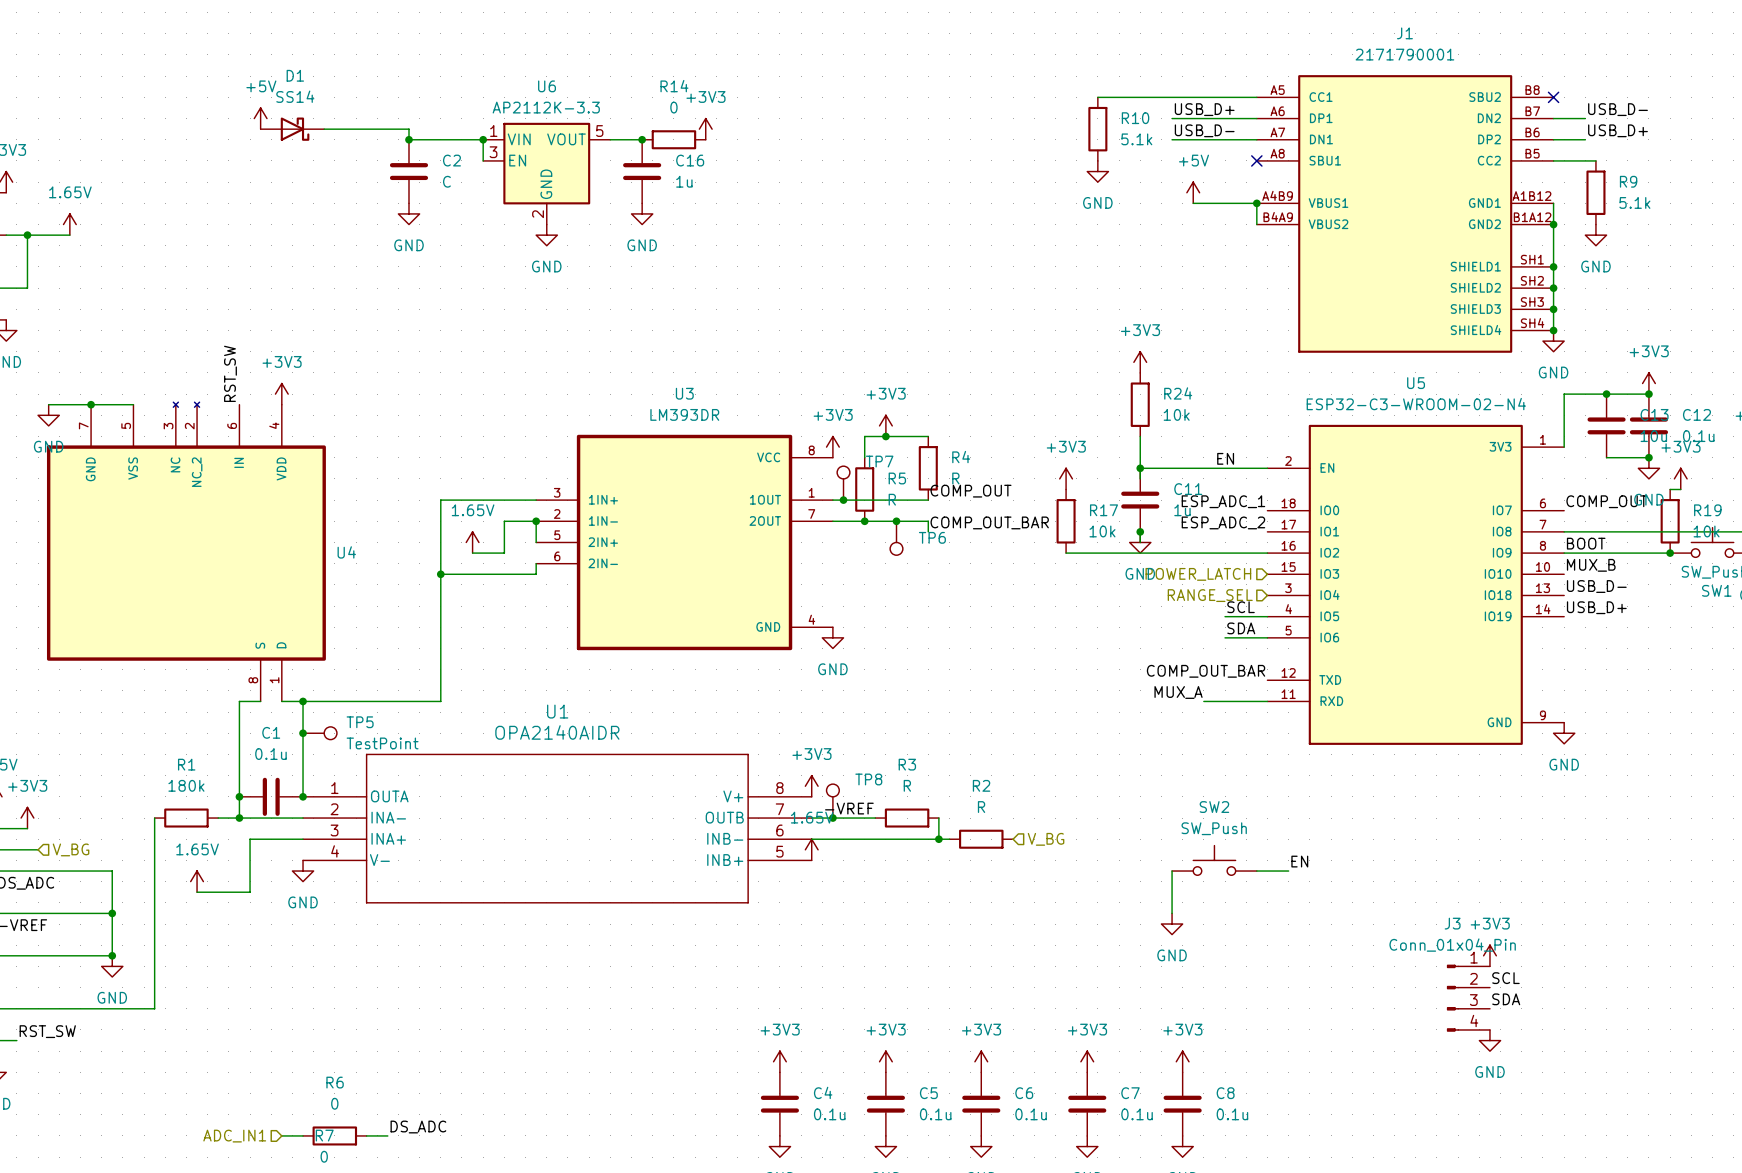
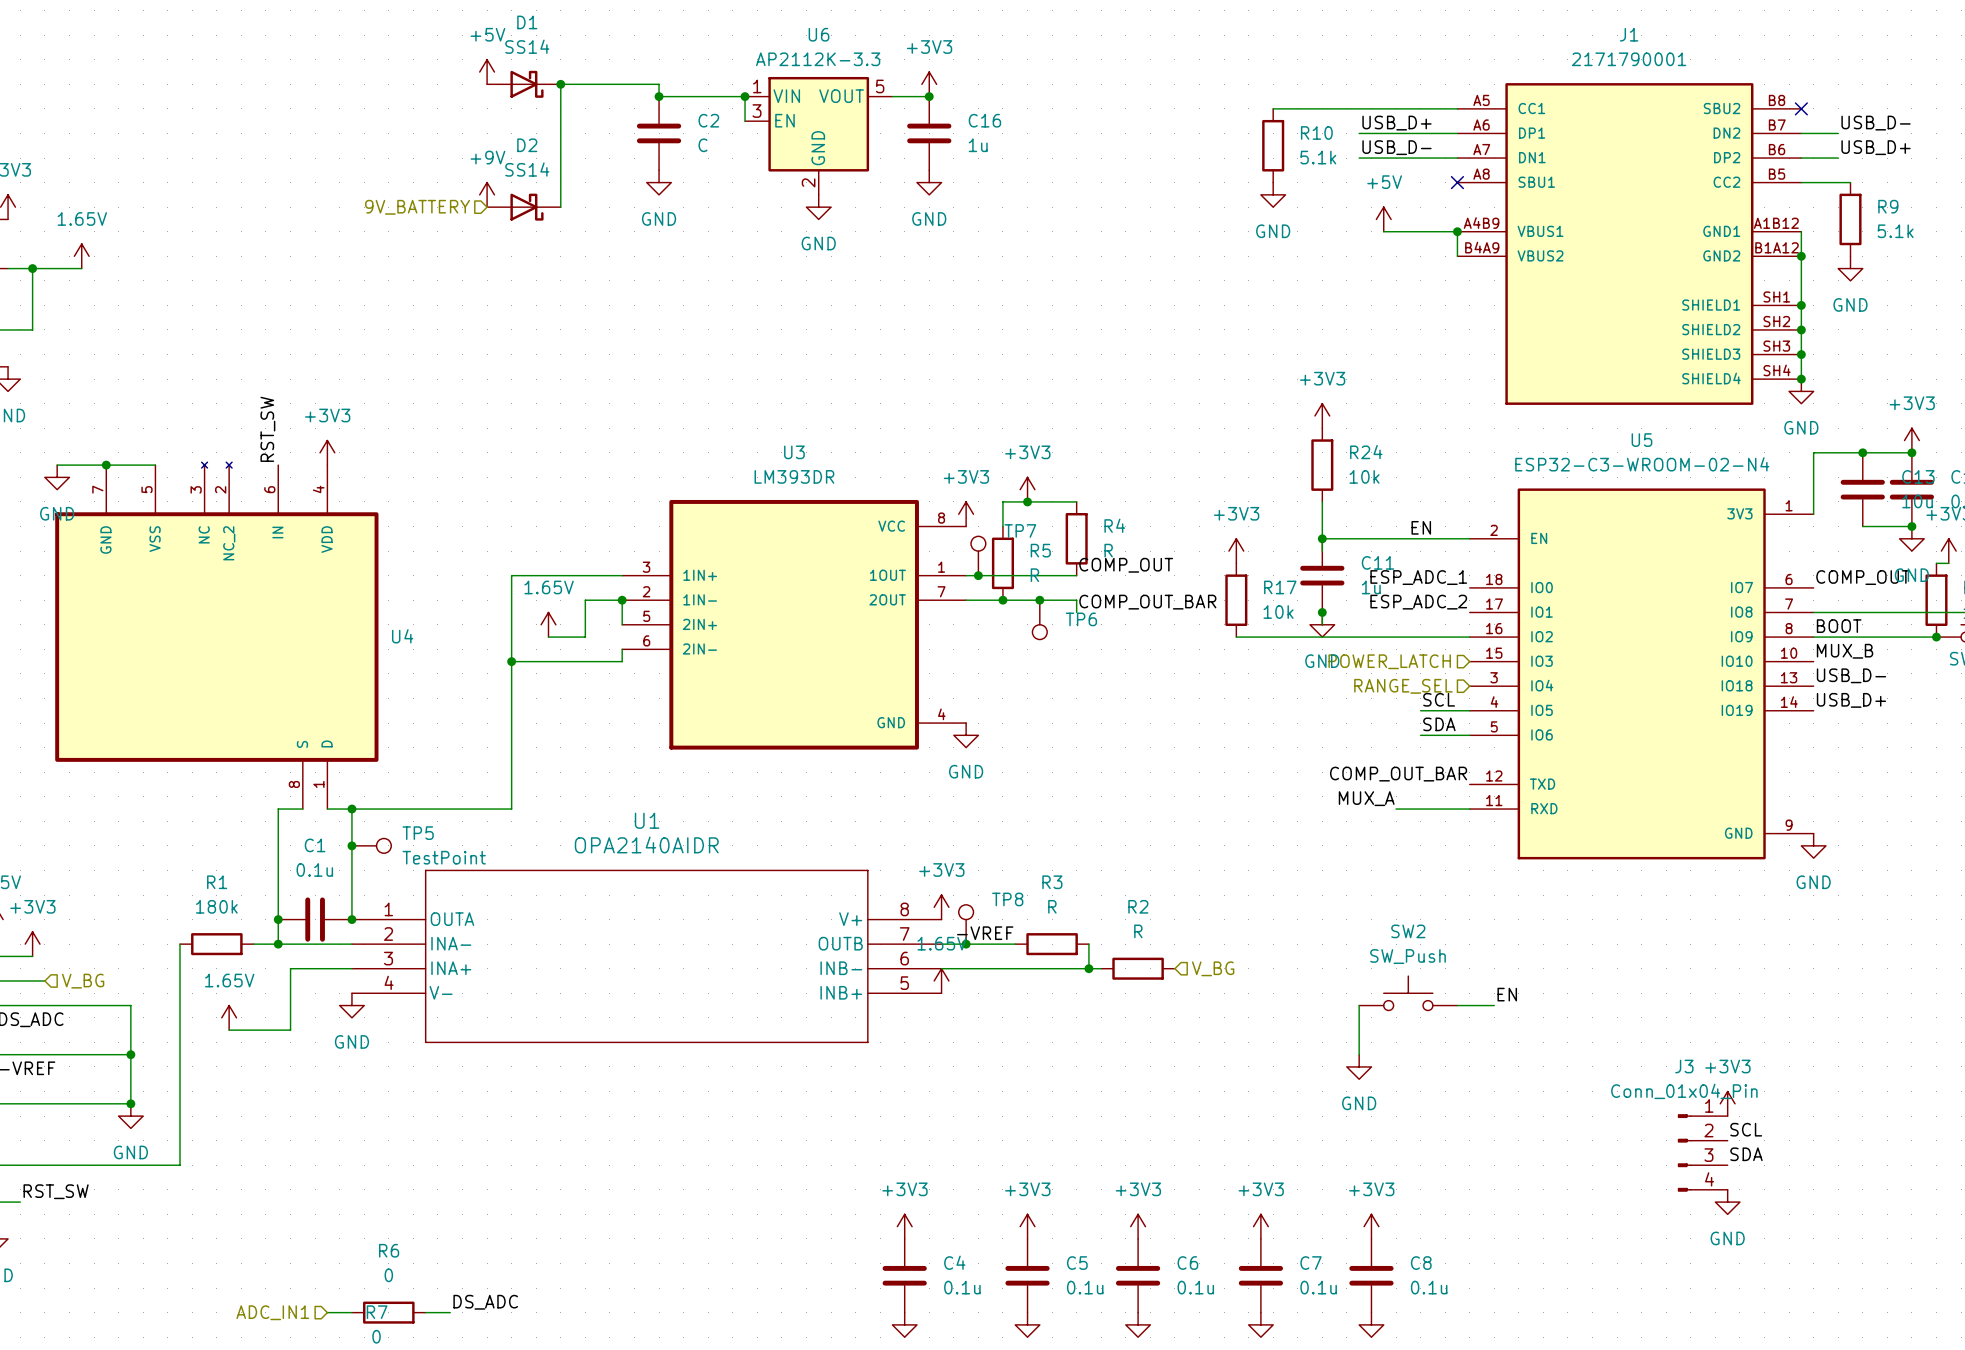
junction: none -> (560, 84)
junction: none -> (659, 96)
junction: none -> (745, 96)
junction: none -> (929, 96)
power symbol position: +5V (260, 118) -> +5V (487, 72)
D1 position: (292, 129) -> (523, 84)
wire: (324, 129) (408, 129) (408, 139) (483, 139) -> (745, 121) (745, 96) (659, 96) (659, 84) (560, 84) (560, 158)
power symbol position: +3V3 (705, 129) -> +3V3 (929, 84)
junction: (408, 139) -> none
junction: (483, 139) -> none
wire: (610, 139) (642, 139) -> (892, 96) (929, 96)
junction: (642, 139) -> none
R14: 0 (673, 139) -> none
wire: none -> (560, 182) (560, 207)
power symbol: none -> GND (659, 182)
power symbol: none -> GND (929, 182)
C2 position: (408, 171) -> (659, 133)
power symbol: none -> +9V (487, 194)
C16 position: (642, 171) -> (929, 133)
U6 position: (546, 173) -> (818, 135)
hierarchical label: none -> 9V_BATTERY (417, 207)
D2: none -> SS14 (523, 207)
power symbol: none -> GND (818, 207)
power symbol: GND (408, 213) -> none
power symbol: GND (642, 213) -> none
power symbol: GND (546, 235) -> none

